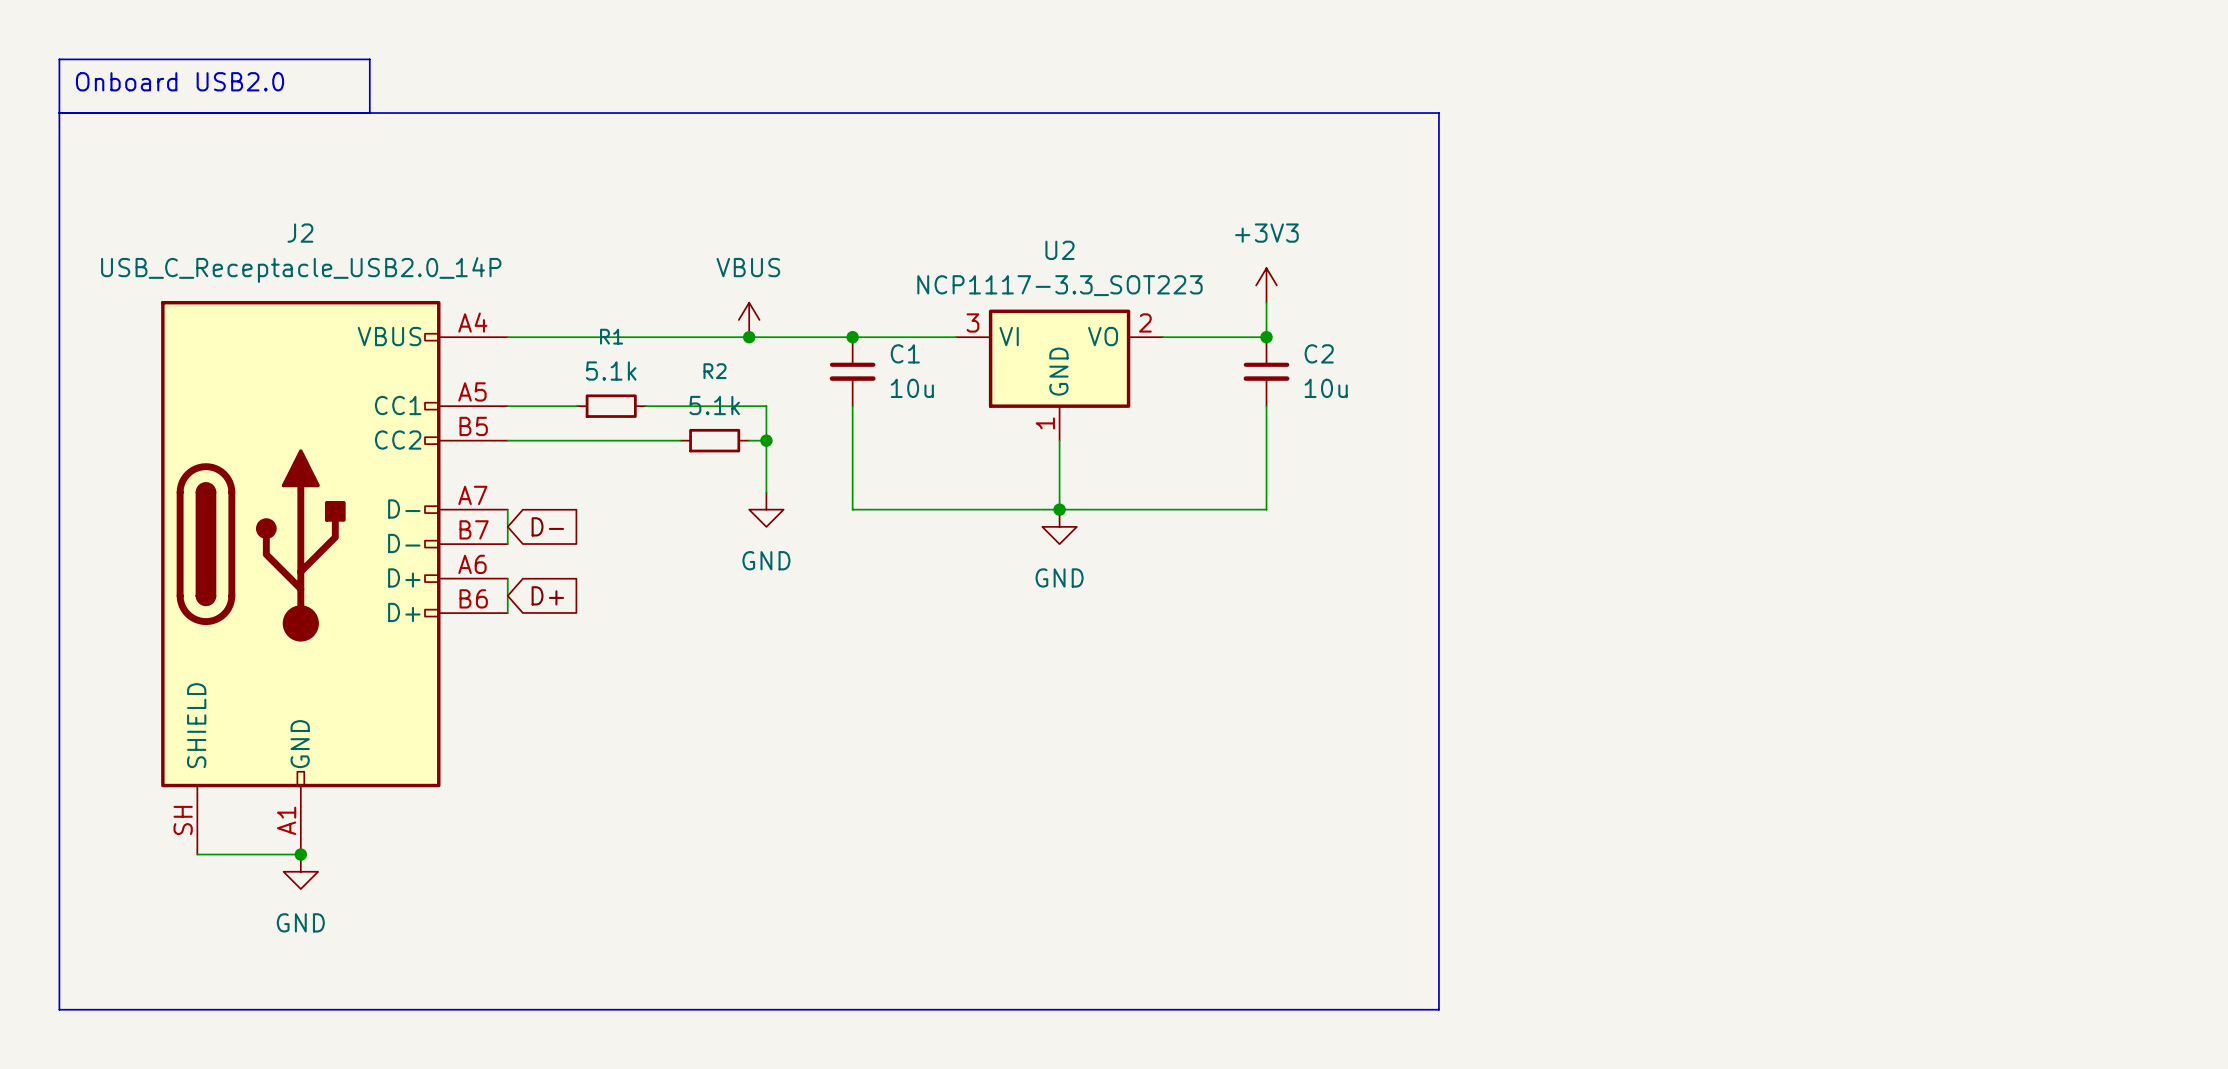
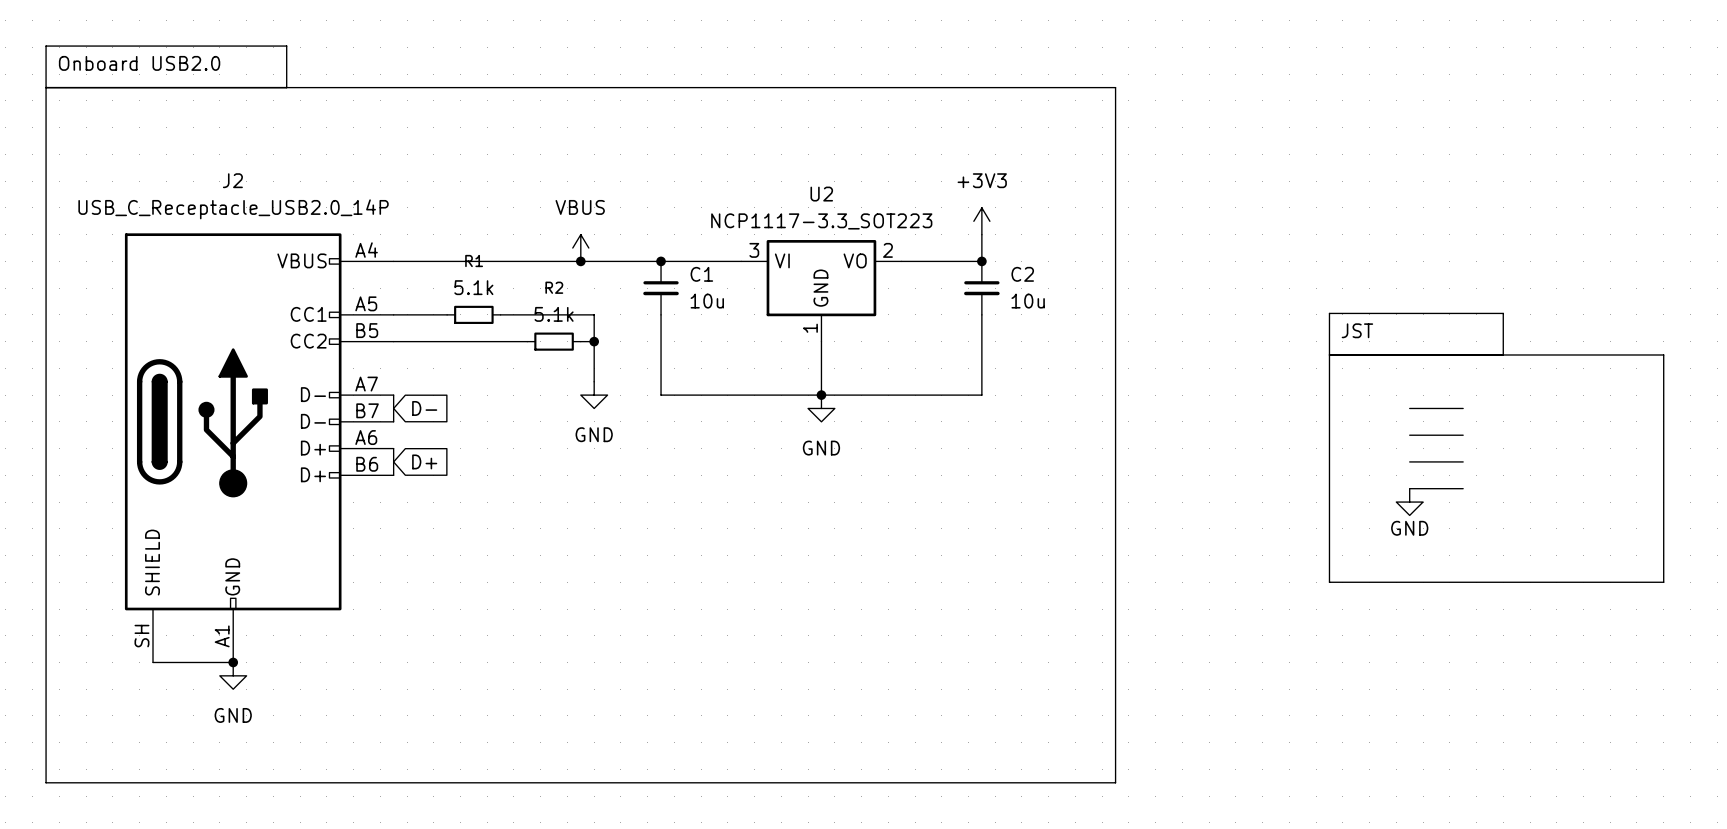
text: none -> JST (1357, 330)
line: none -> (1329, 354) (1663, 354) (1663, 582) (1329, 582) (1329, 313) (1503, 313) (1503, 354)
wire: none -> (1409, 408) (1463, 408)
wire: none -> (1409, 435) (1463, 435)
wire: none -> (1409, 461) (1463, 461)
wire: none -> (1409, 488) (1463, 488)
power symbol: none -> GND (1409, 502)

